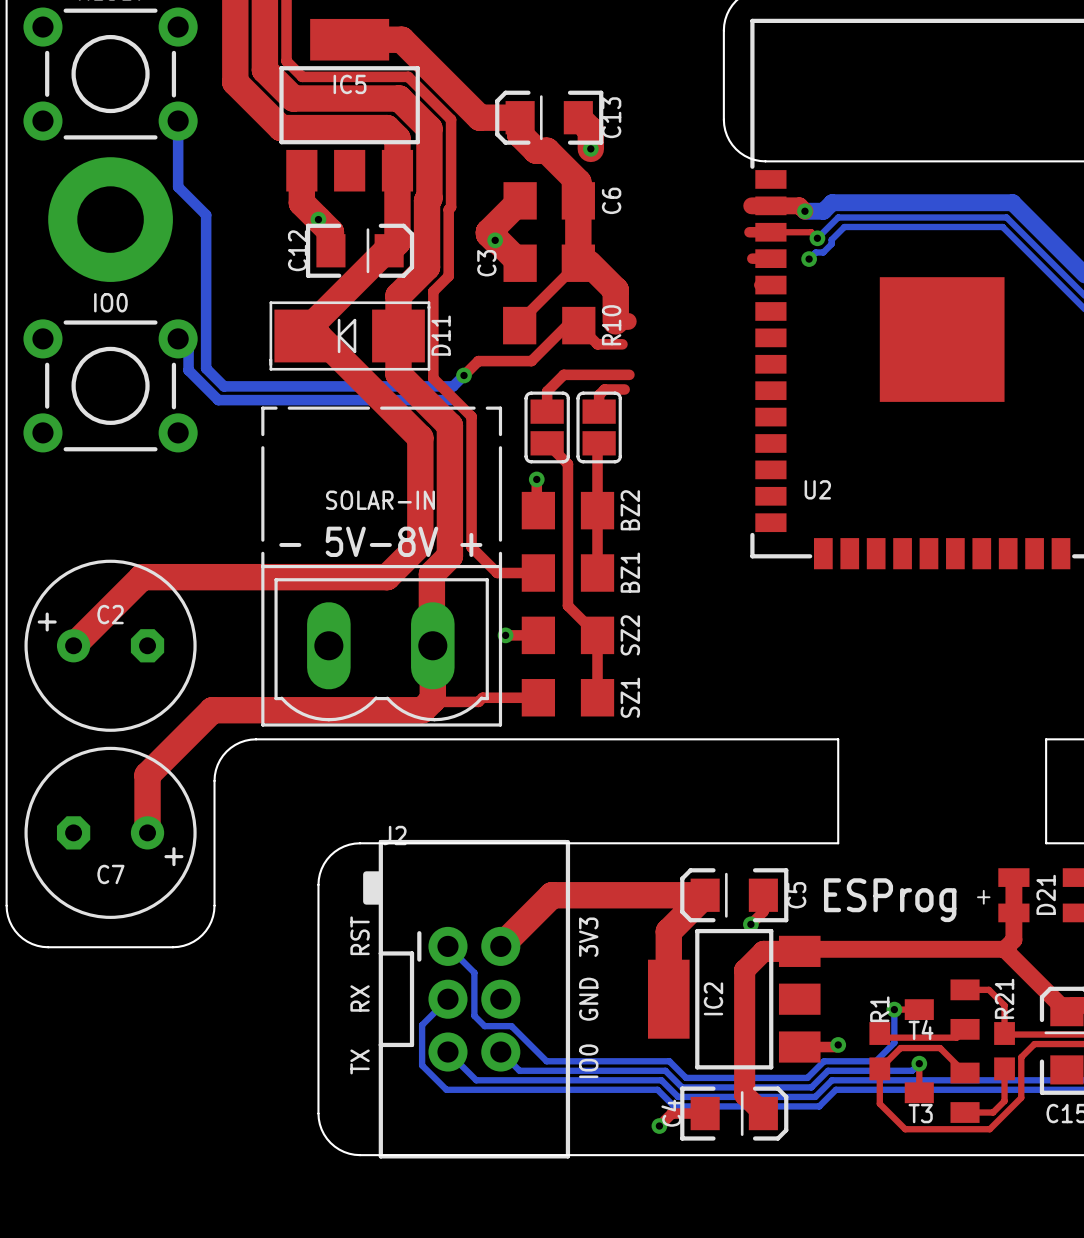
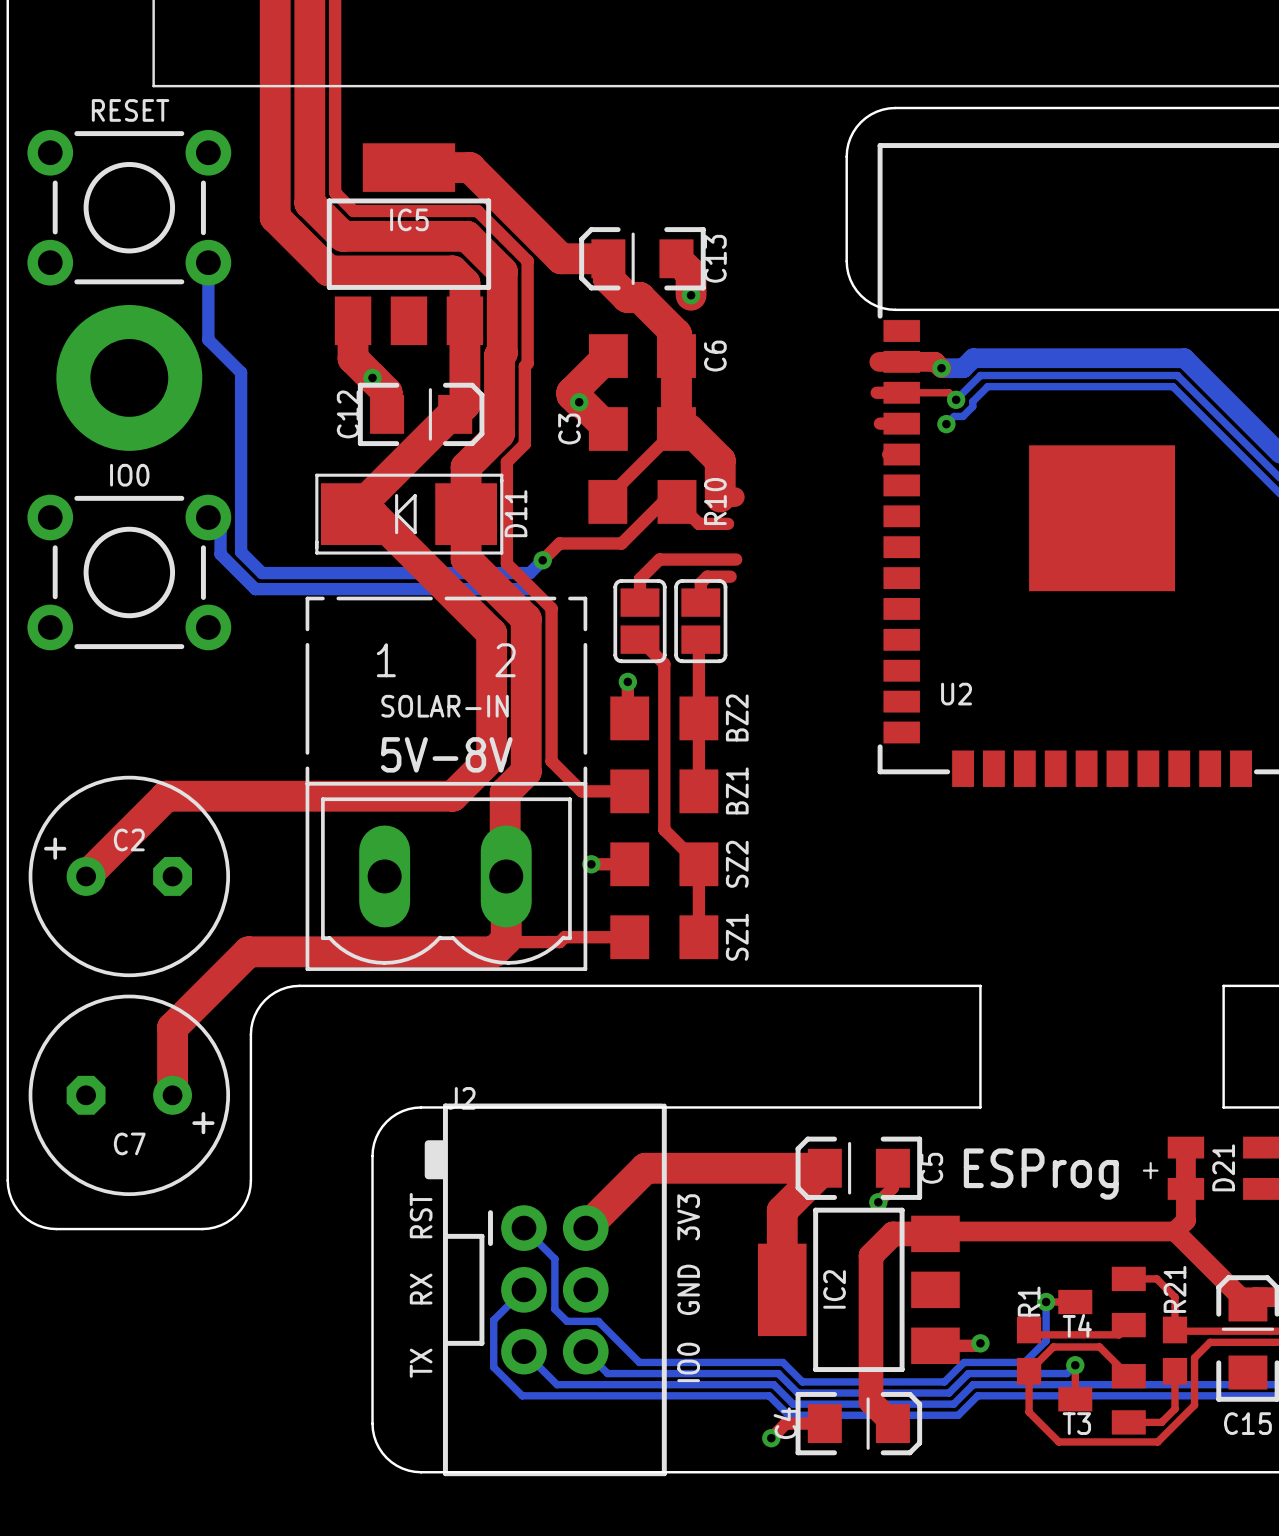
SOLAR-IN text: none -> 1 (386, 660)
SOLAR-IN text: none -> 2 (505, 660)
text: - 5V-8V + (380, 541) -> 5V-8V (446, 754)

